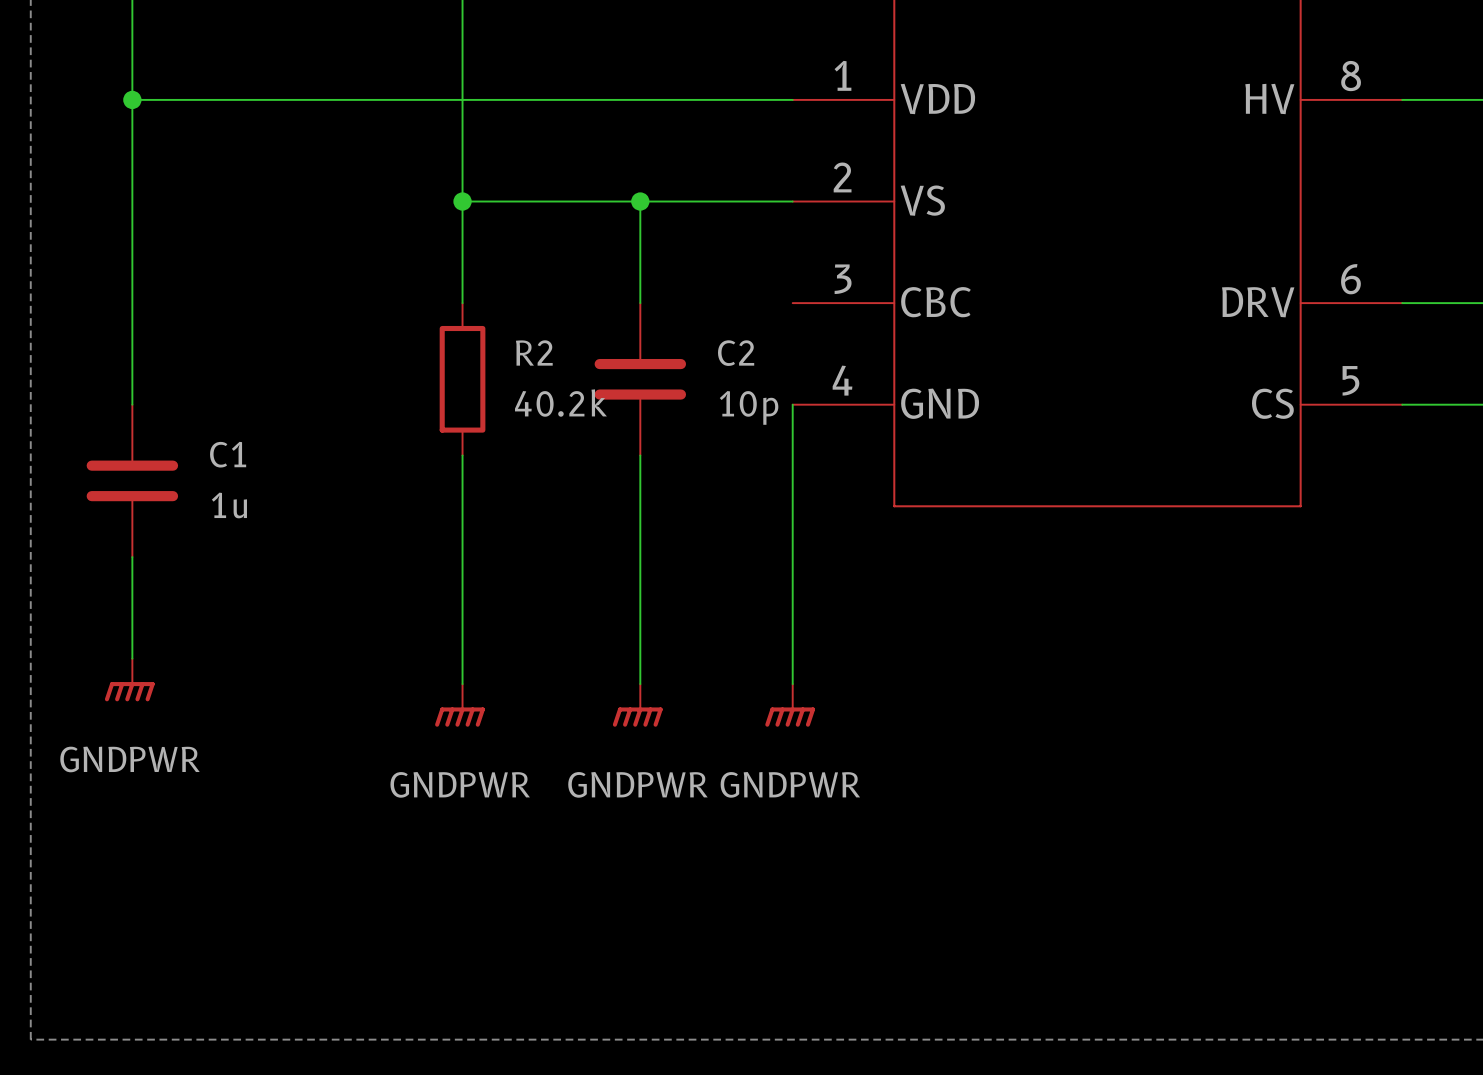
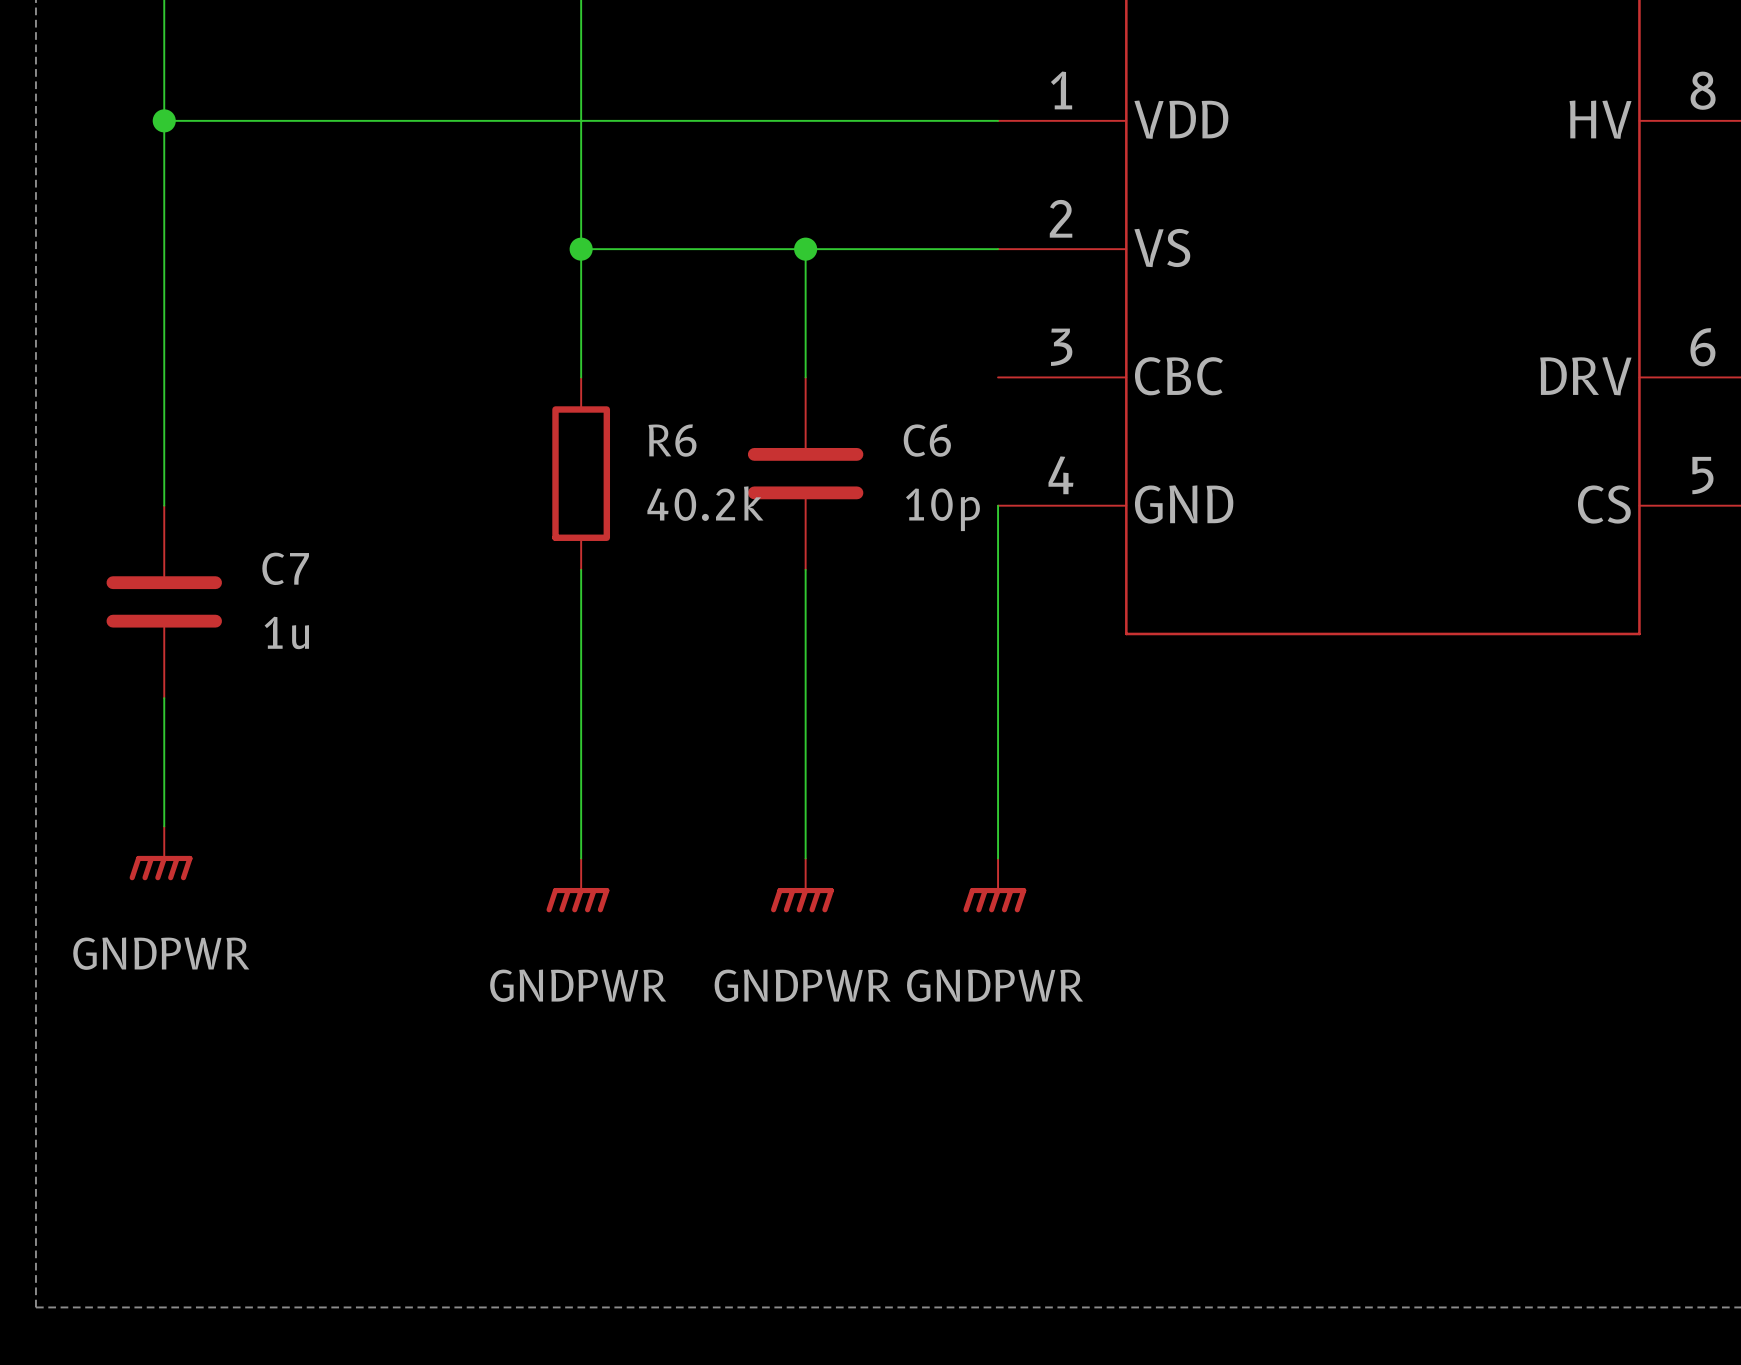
R2 name: R2 (534, 352) -> R6 (672, 440)
C2 name: C2 (736, 353) -> C6 (927, 440)
C1 name: C1 (228, 454) -> C7 (285, 568)

